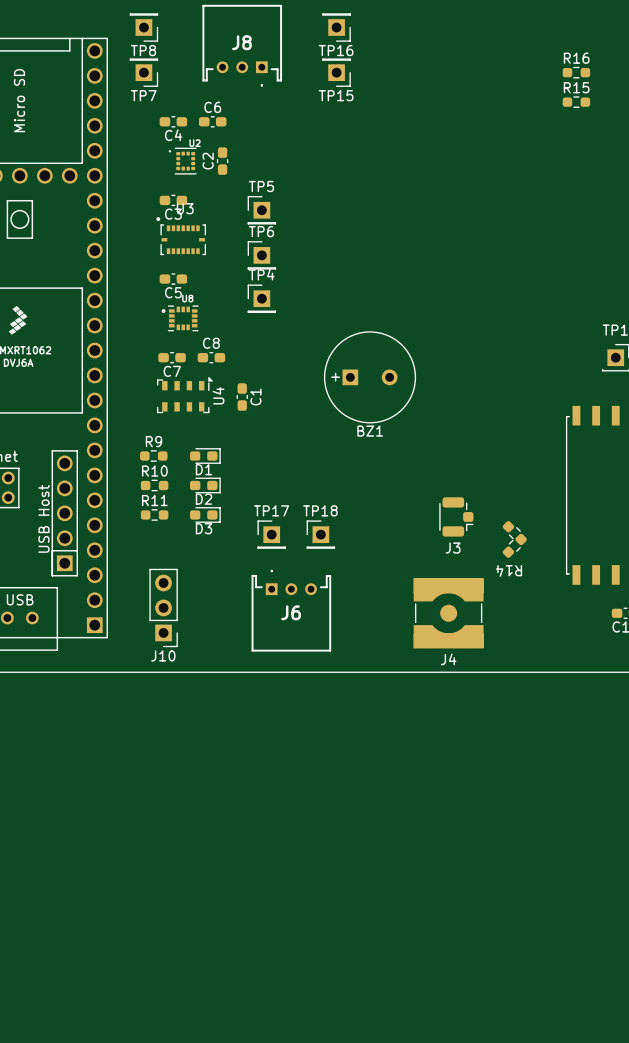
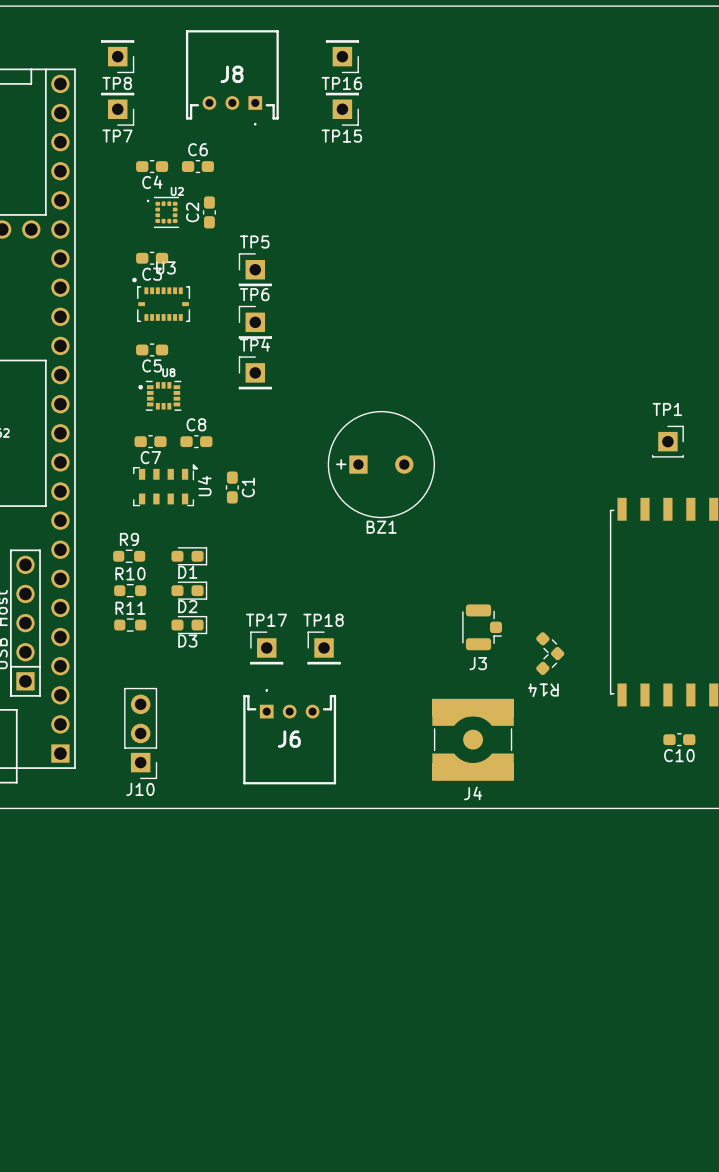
R16: (576, 72) -> none
R15: (576, 102) -> none

